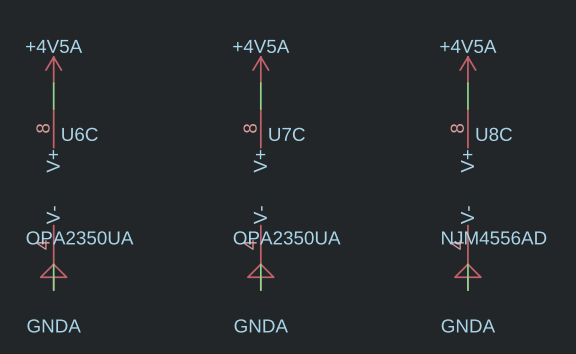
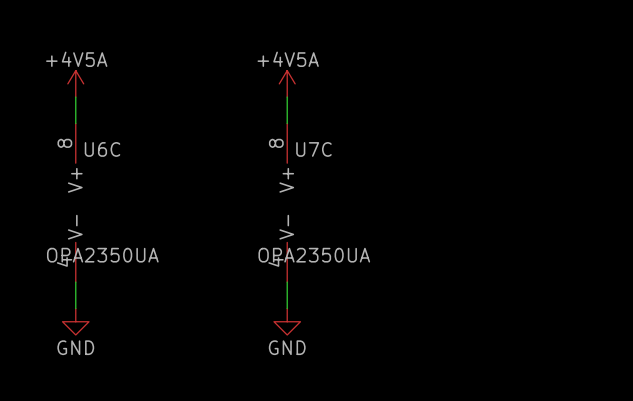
power symbol: +4V5A (467, 70) -> none
wire: (467, 83) (467, 108) -> none
U8C: NJM4556AD (467, 186) -> none
wire: (467, 264) (467, 290) -> none
power symbol: GNDA (53, 277) -> none
power symbol: GNDA (260, 277) -> none
power symbol: GNDA (467, 277) -> none
power symbol: none -> GND (75, 321)
power symbol: none -> GND (287, 321)

